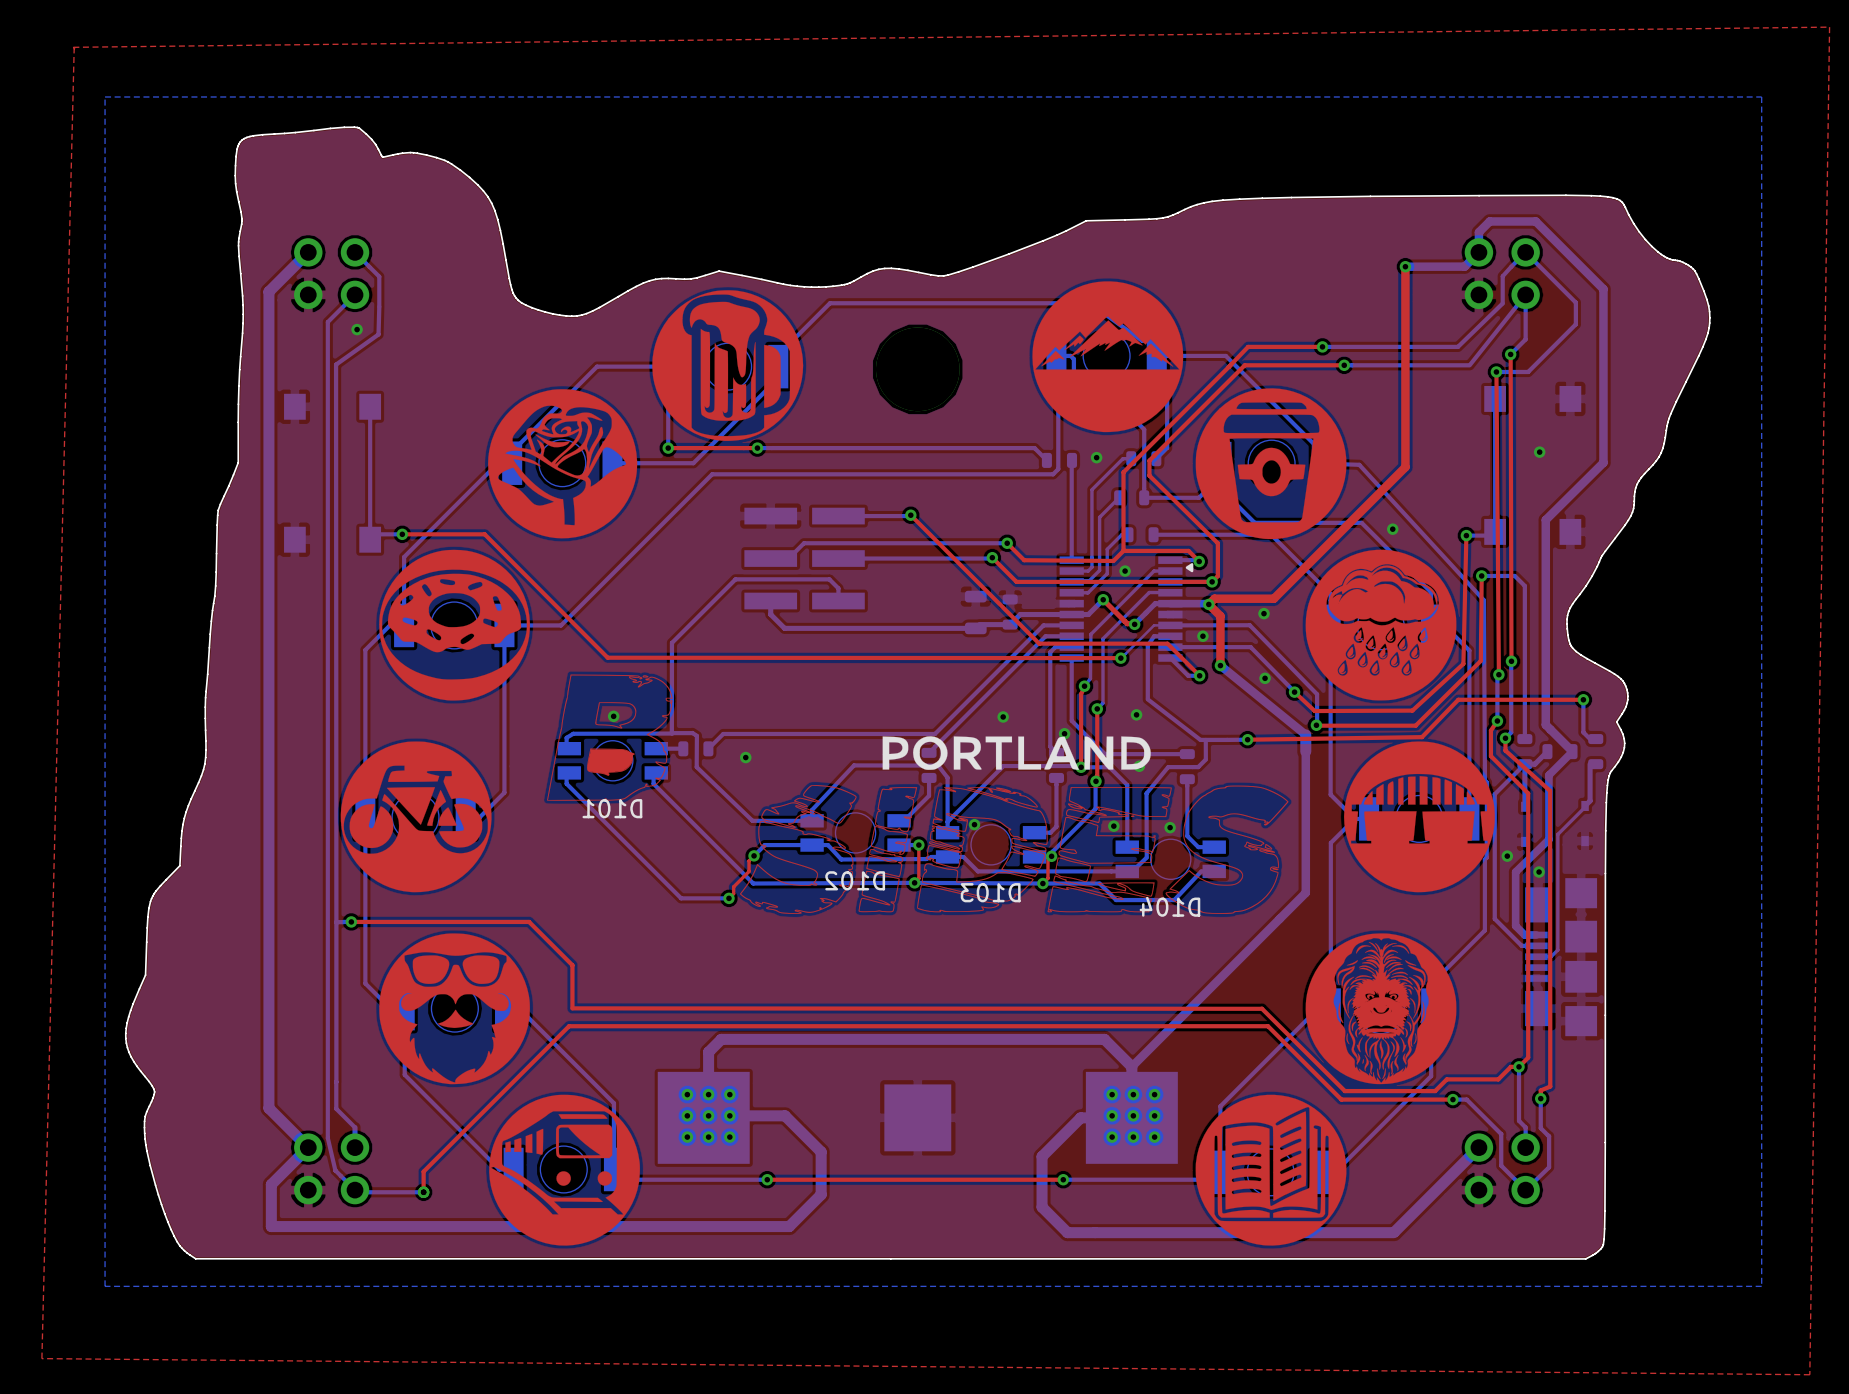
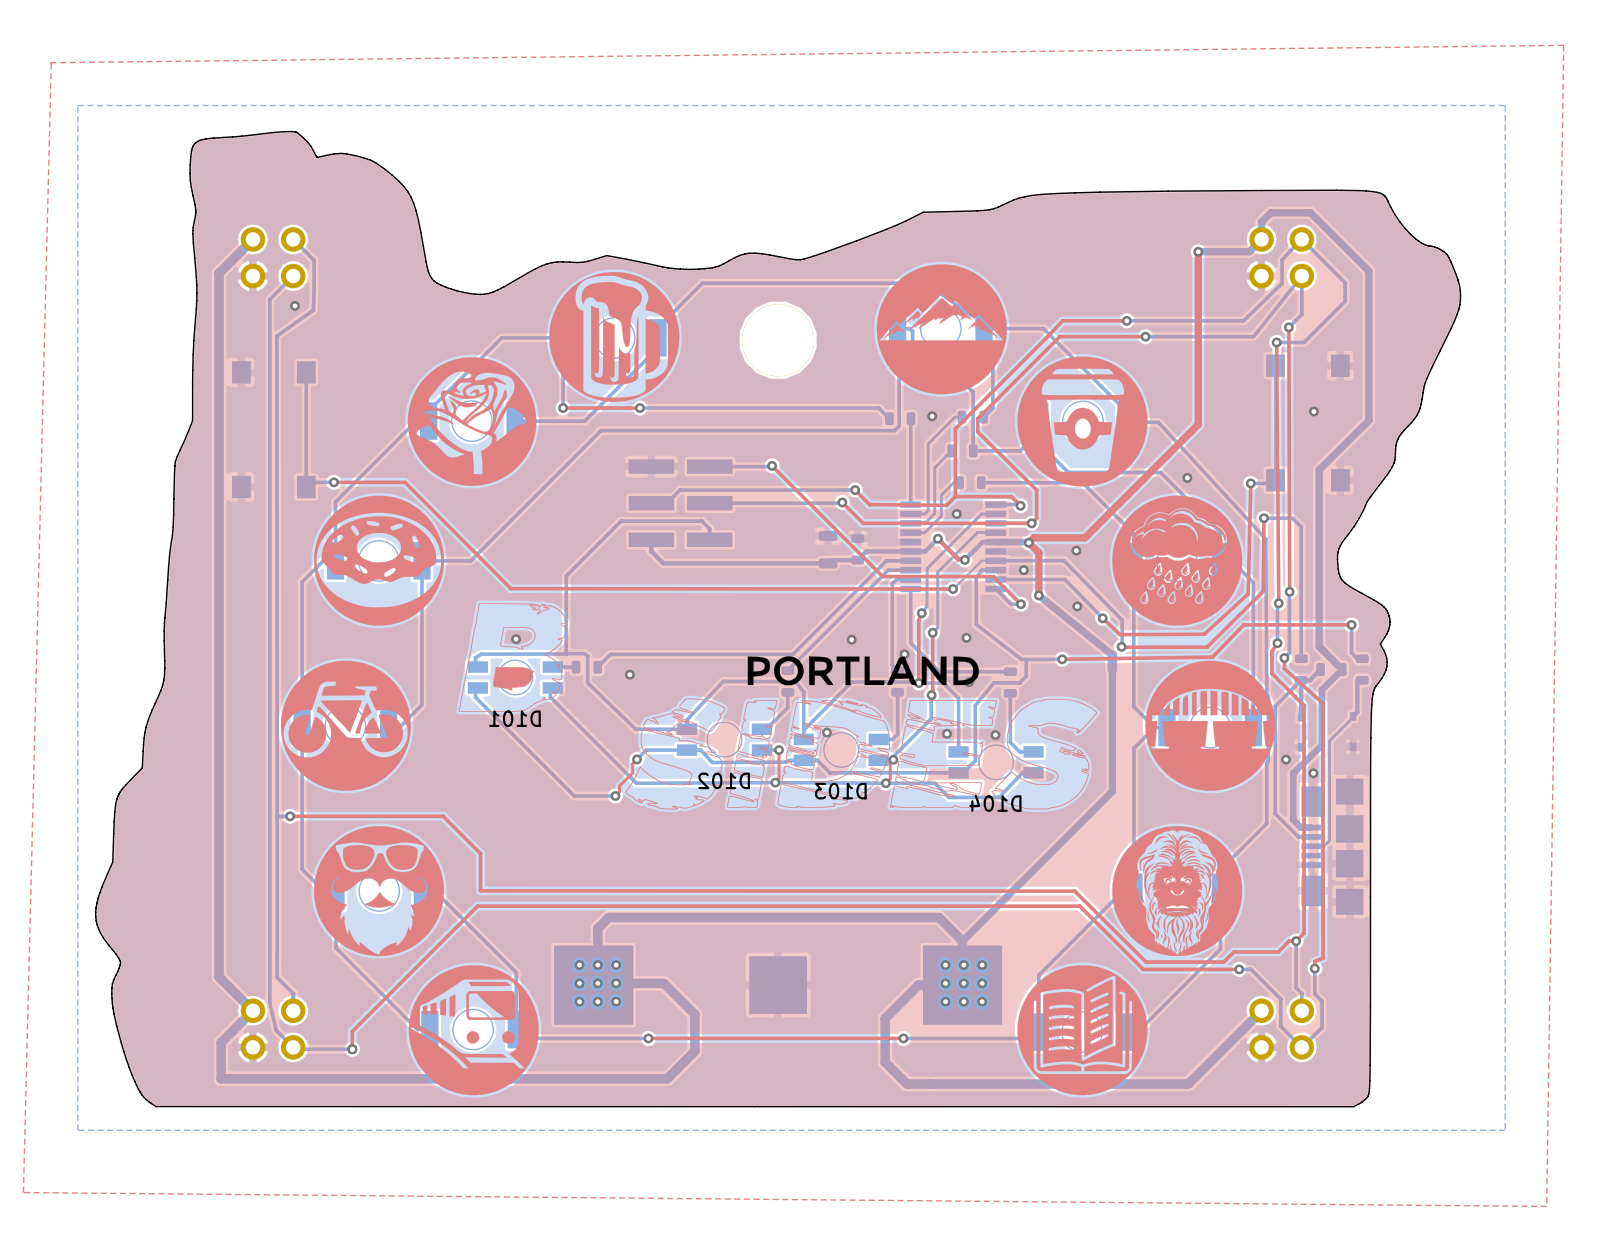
drawing: [1185, 563, 1194, 573] -> none

